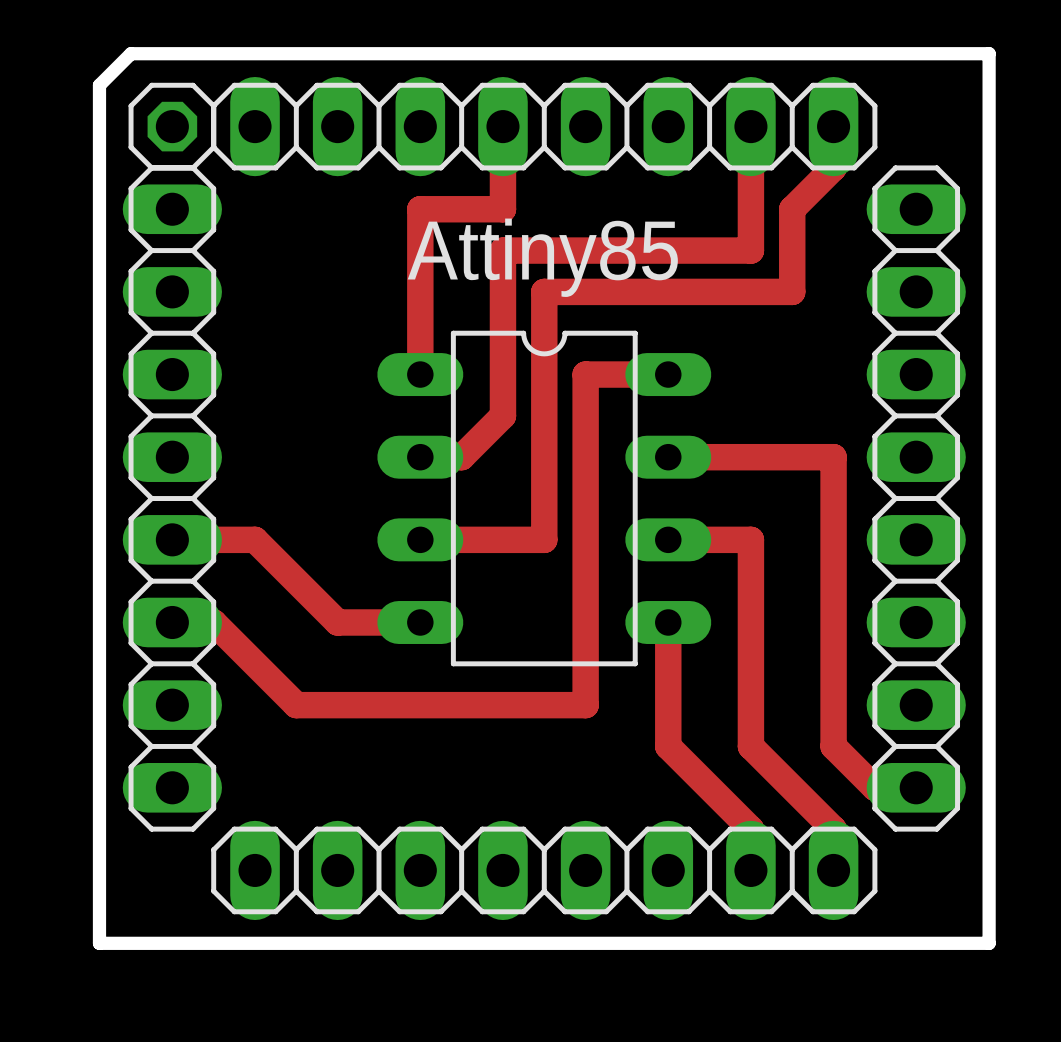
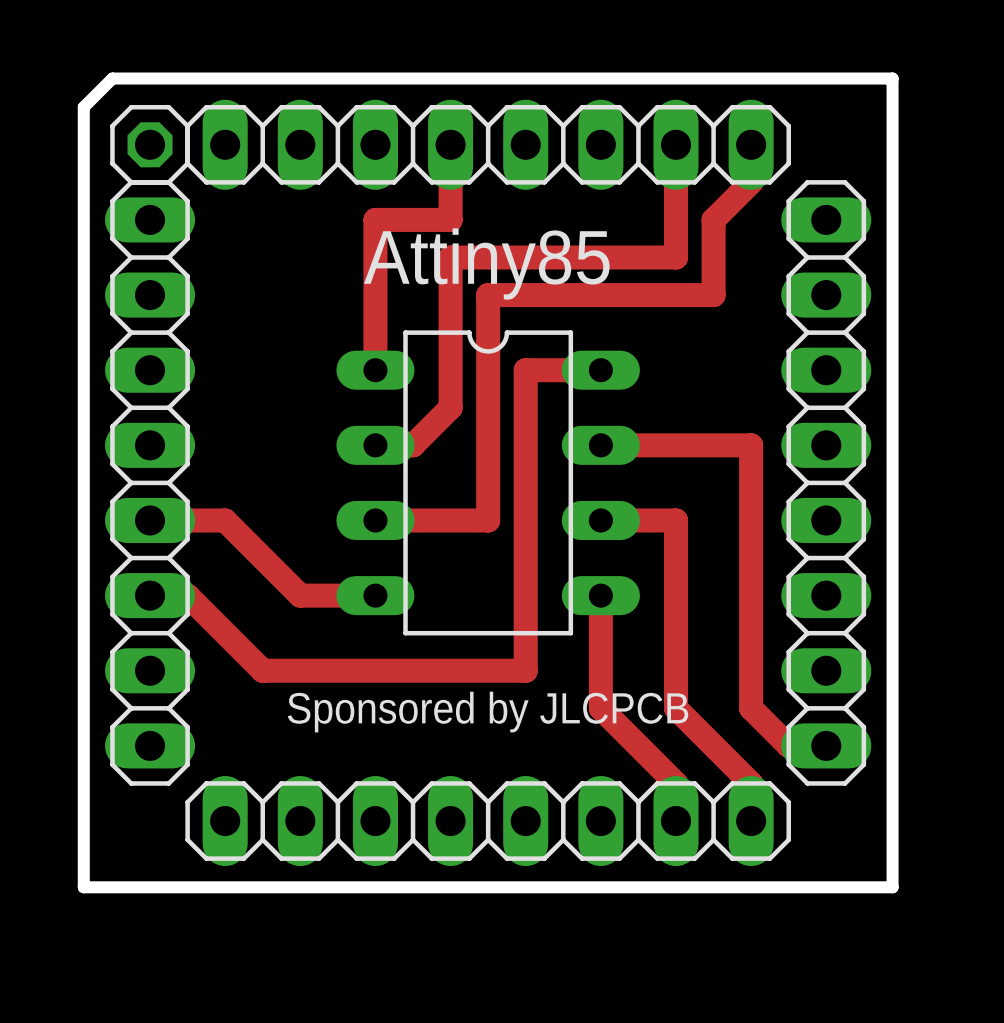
text: none -> Sponsored by JLCPCB (488, 712)

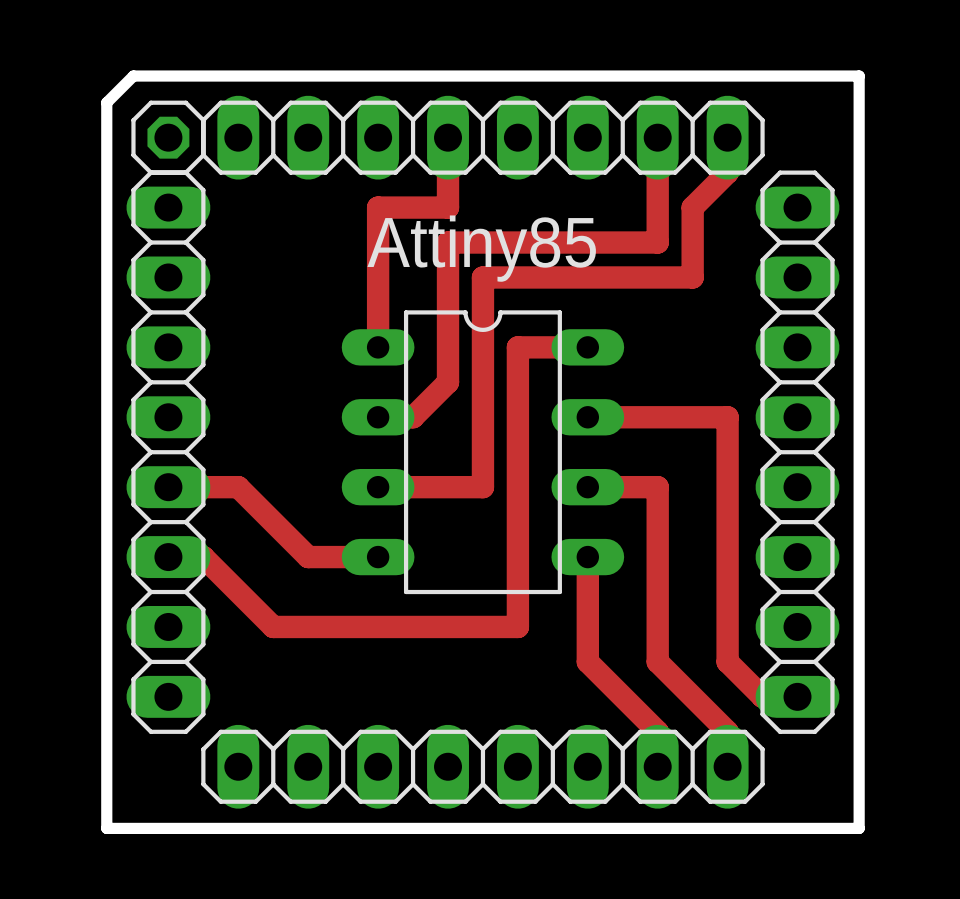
text: Sponsored by JLCPCB (488, 712) -> none

